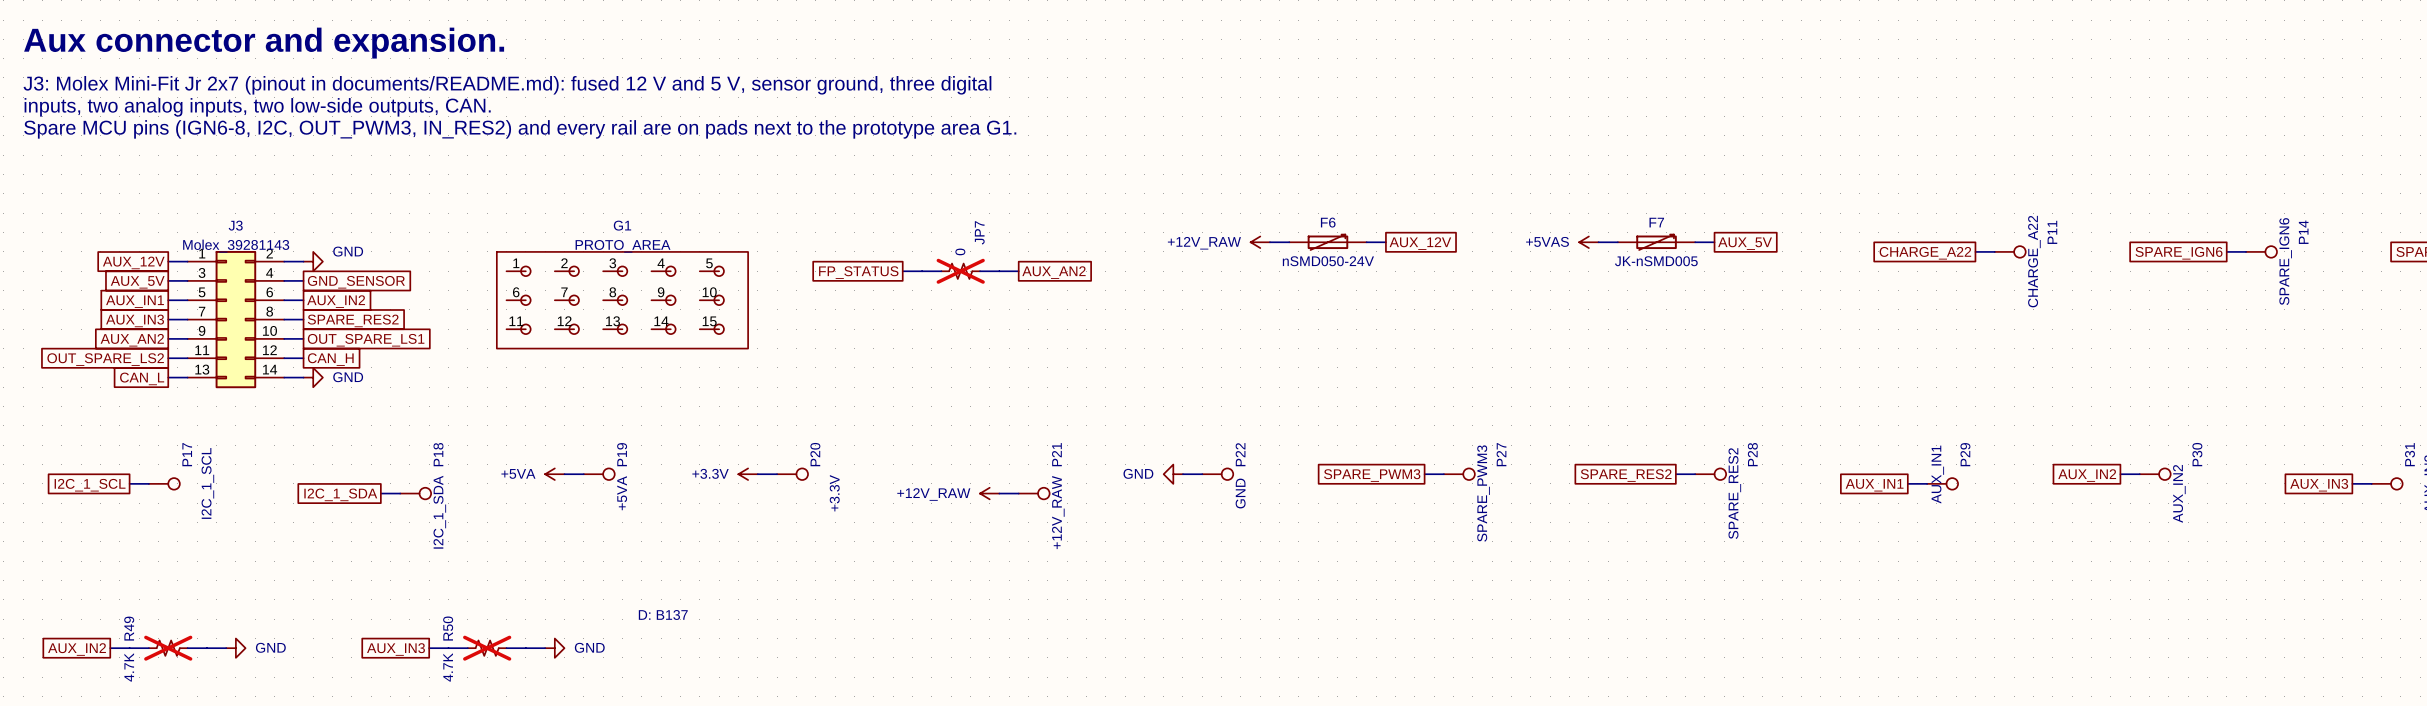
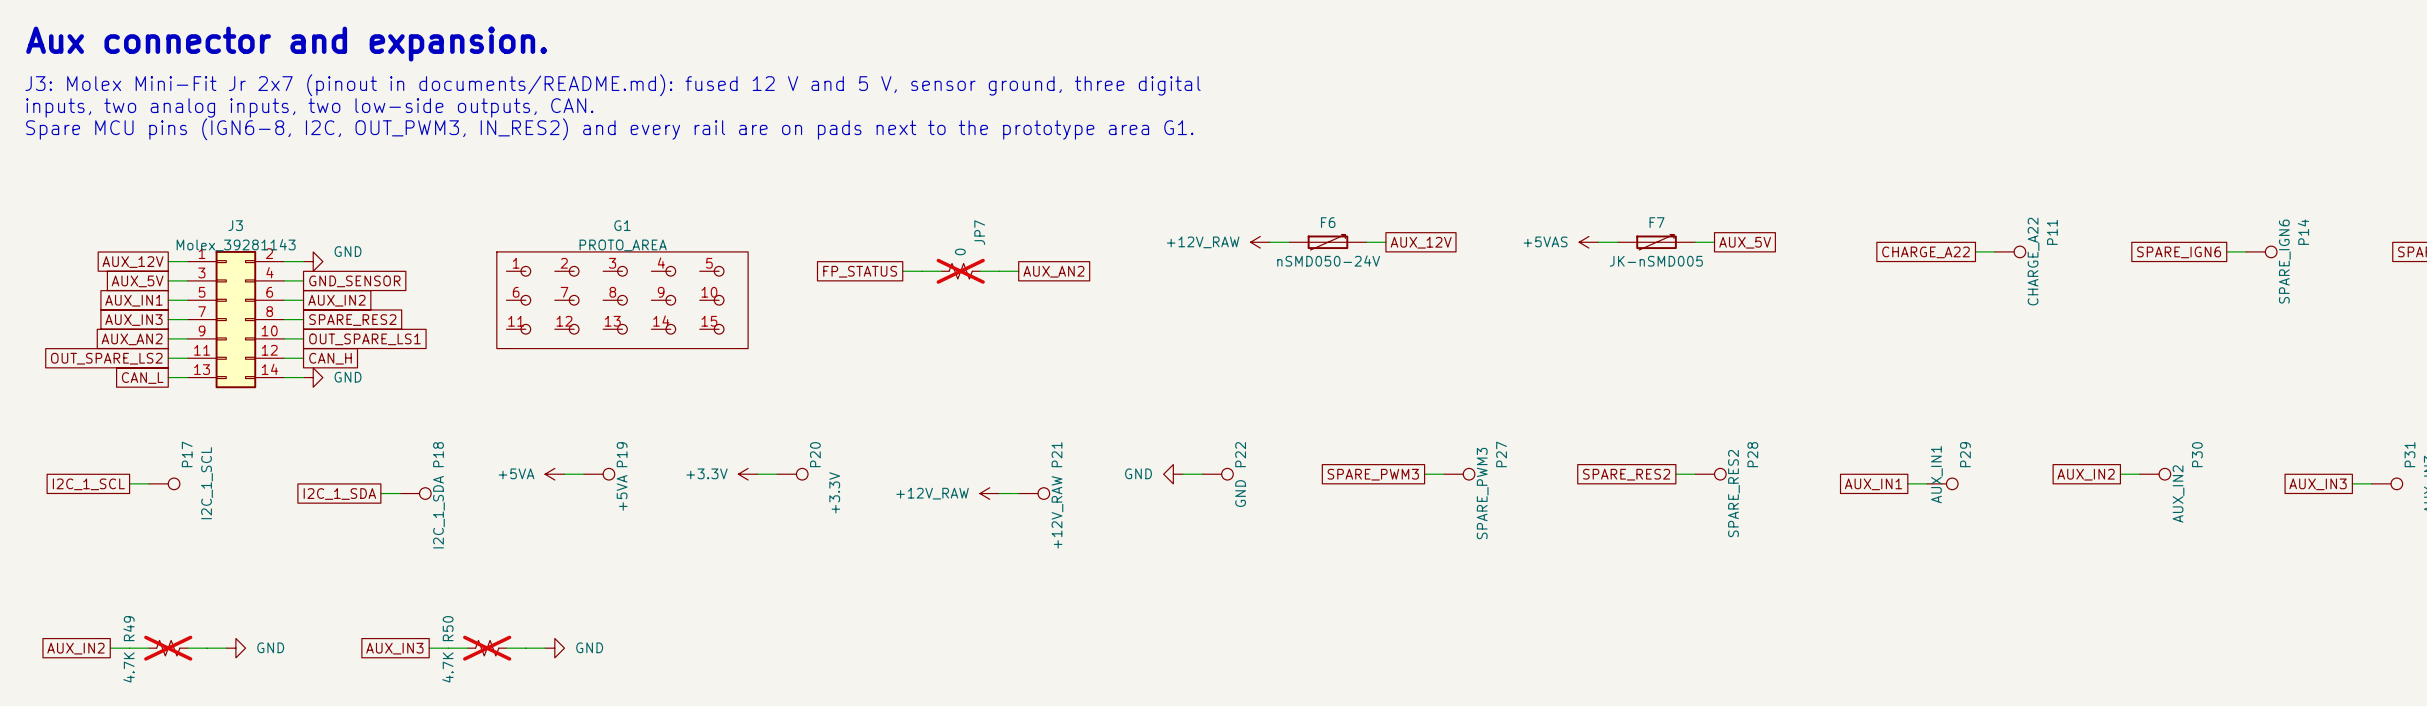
text: D: B137 (663, 614) -> none

